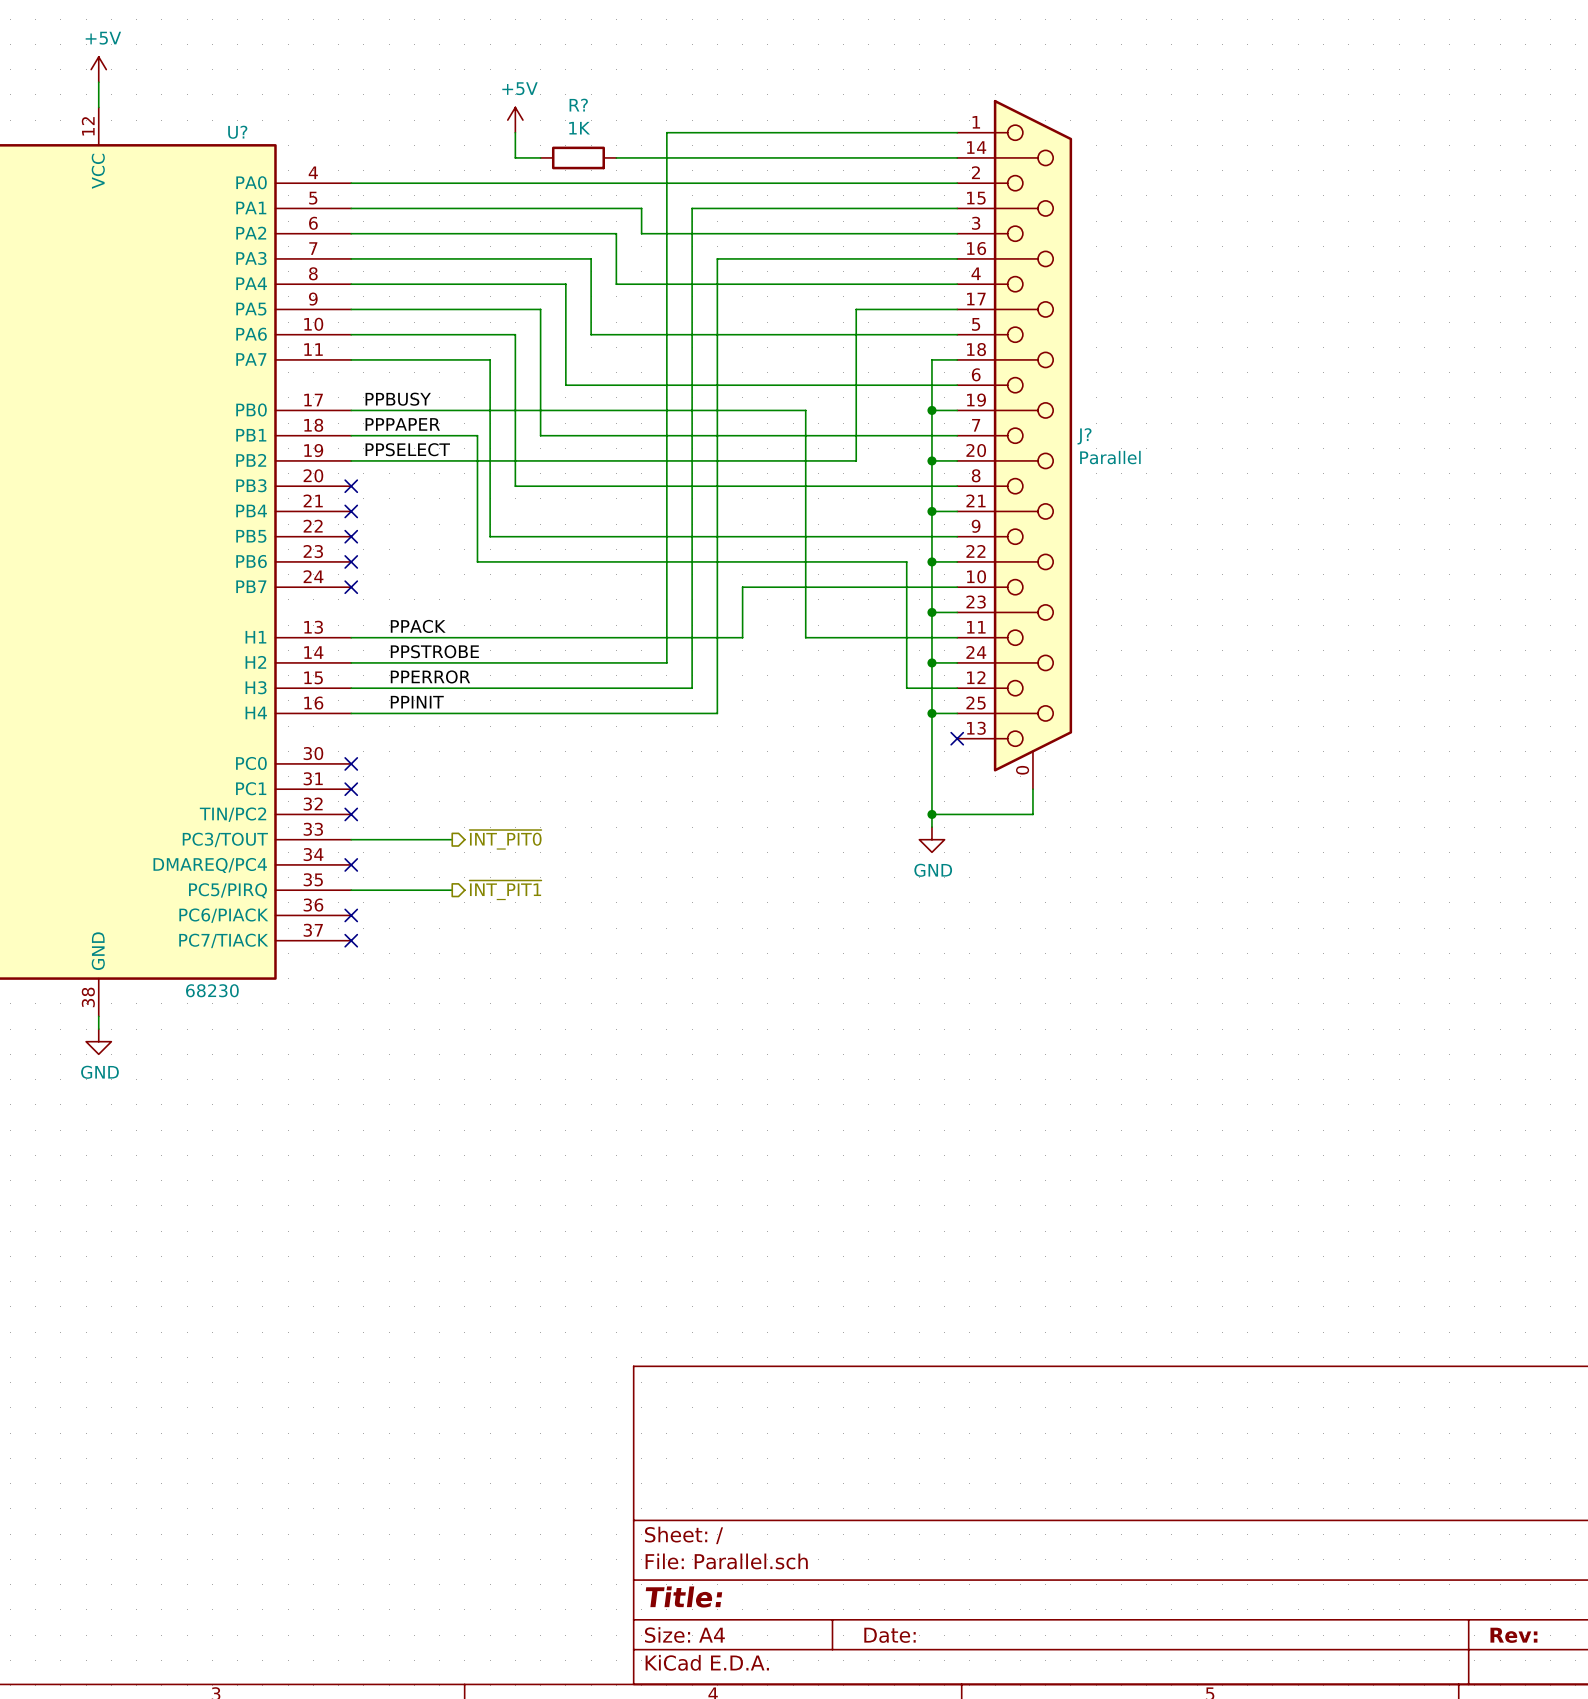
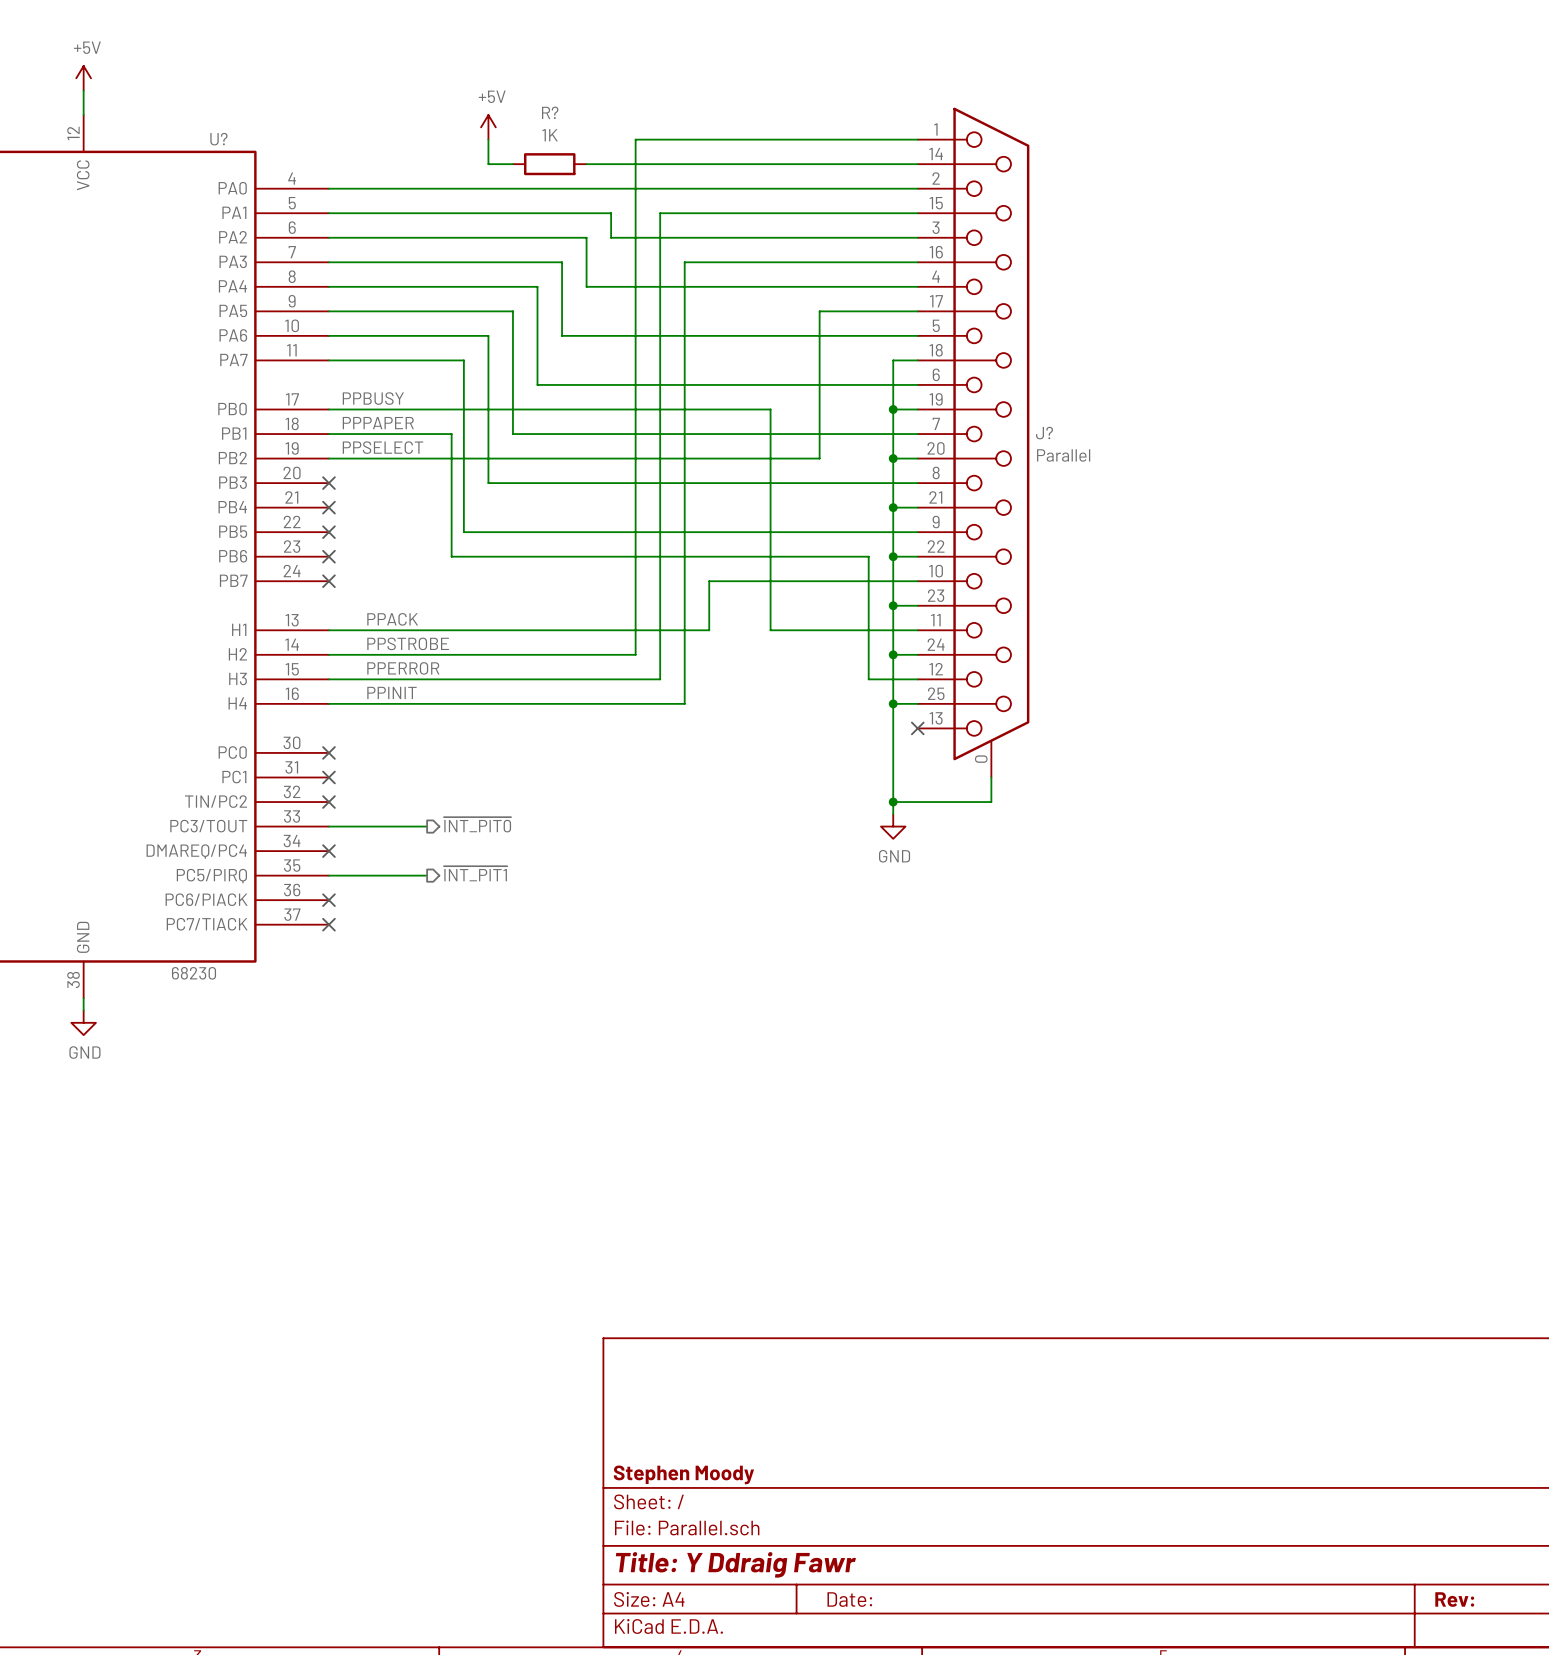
title block: none -> Stephen Moody (683, 1474)
title block: Title: (683, 1596) -> Title: Y Ddraig Fawr (735, 1564)

